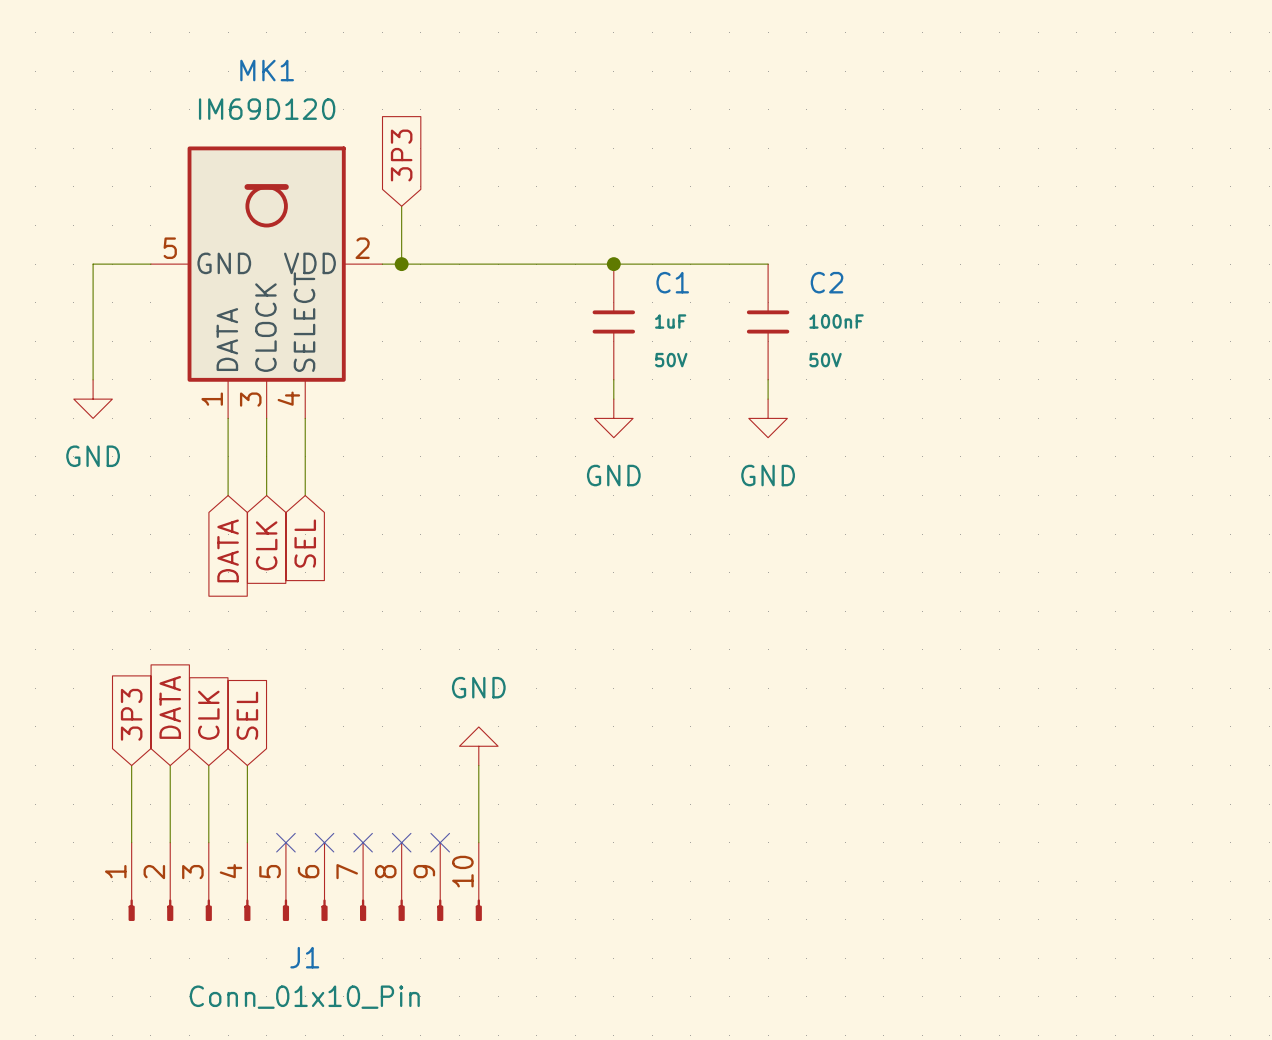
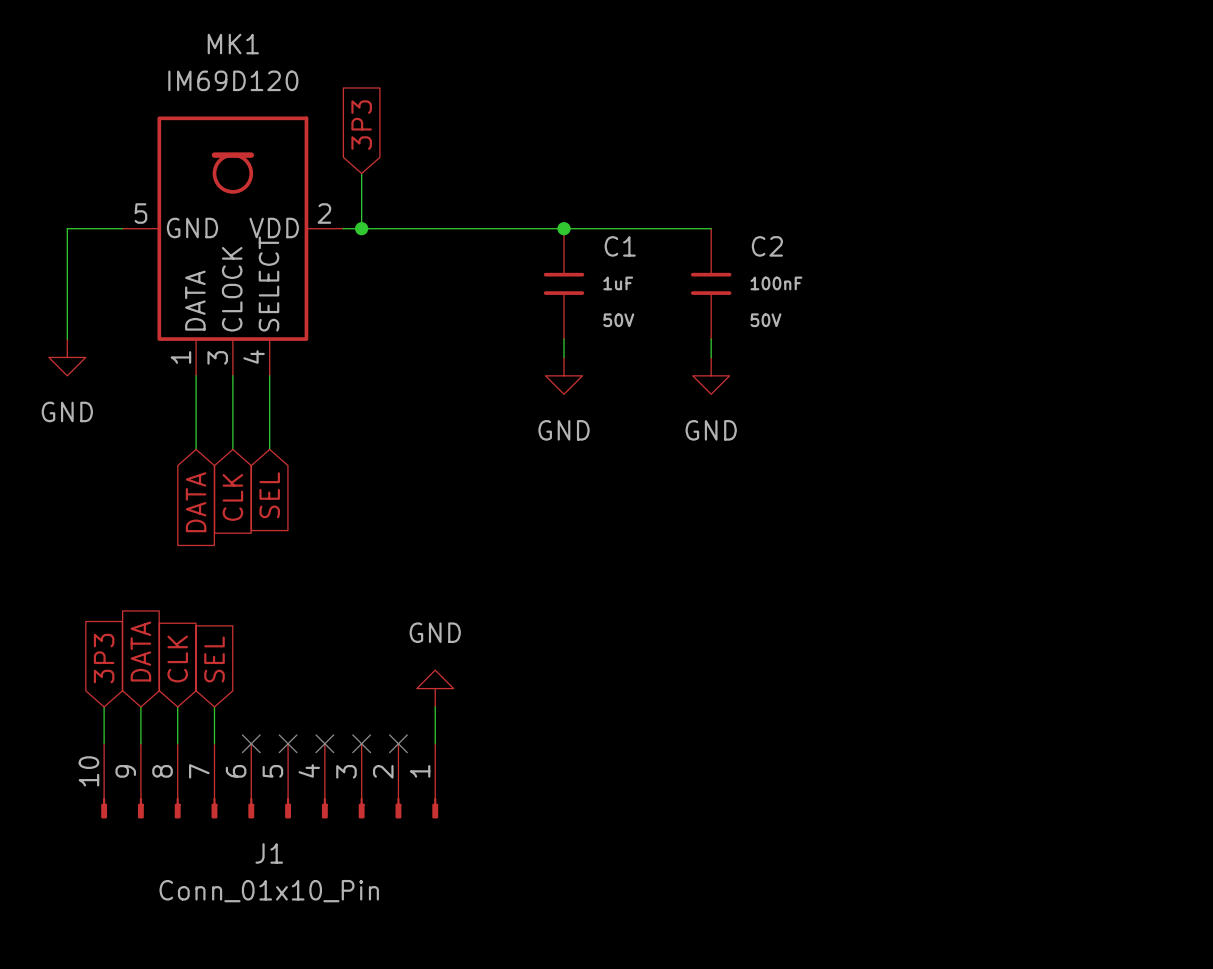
no-connect mark: none -> (251, 743)
no-connect mark: none -> (288, 743)
no-connect mark: none -> (324, 743)
no-connect mark: none -> (361, 743)
no-connect mark: none -> (398, 743)
no-connect mark: (285, 842) -> none
no-connect mark: (324, 842) -> none
no-connect mark: (363, 842) -> none
no-connect mark: (401, 842) -> none
no-connect mark: (440, 842) -> none
J1 flip: as is (305, 910) -> left-right (269, 808)

